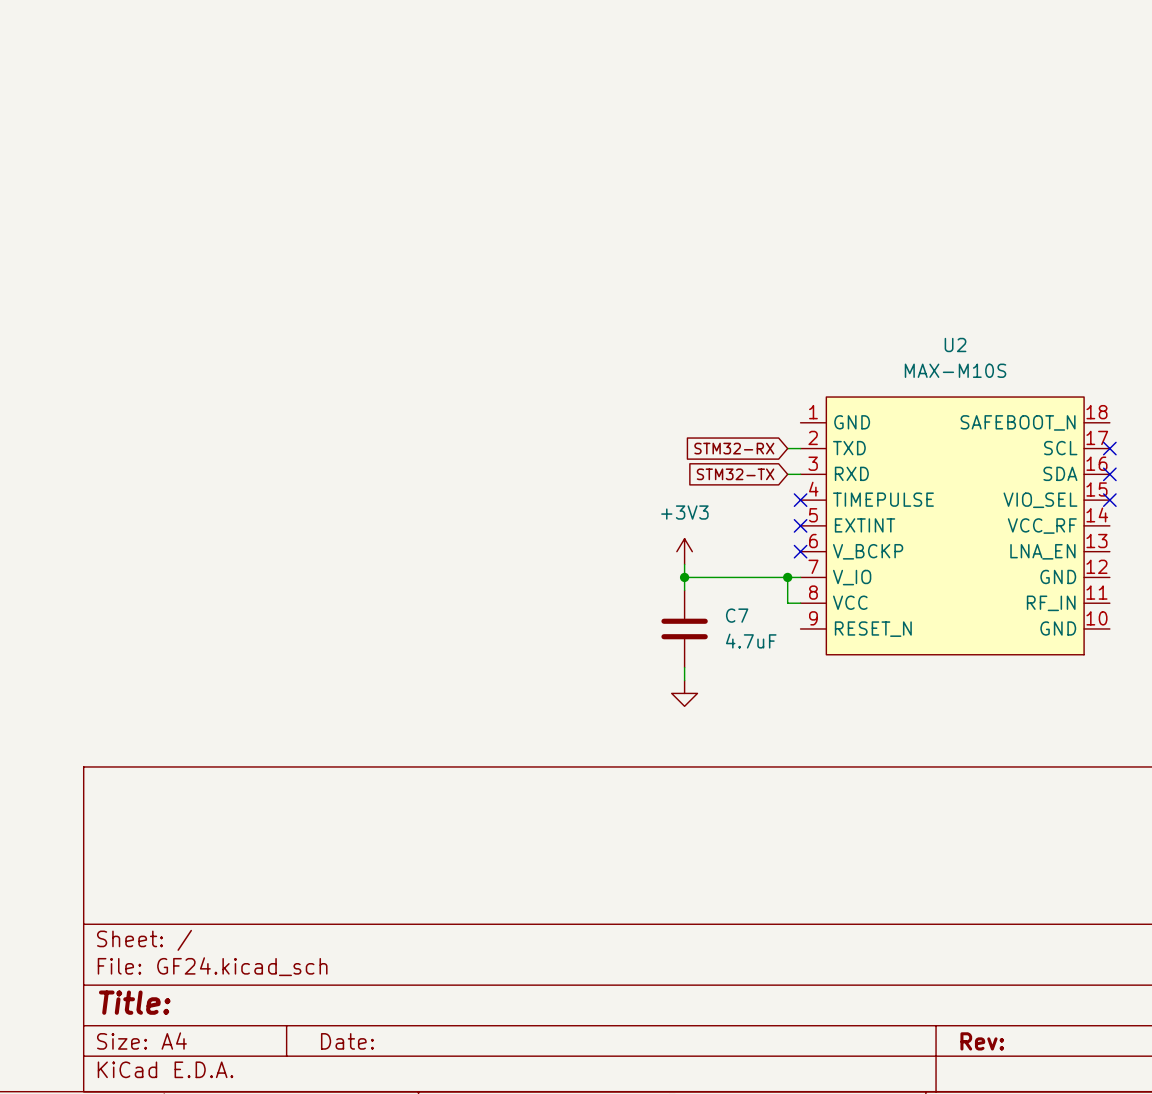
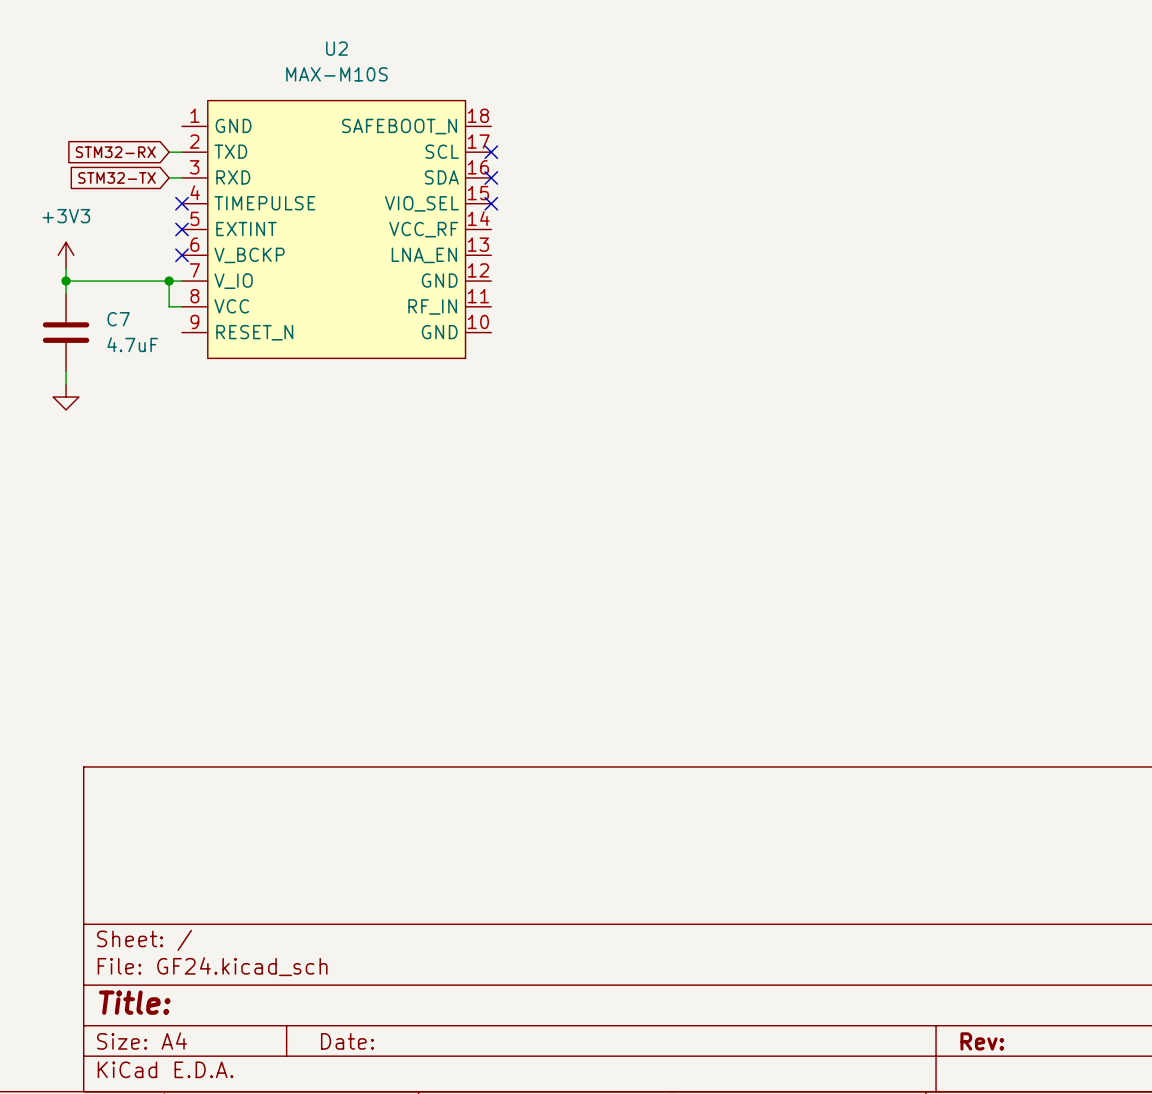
global label: none -> STM32-RX (115, 152)
wire: none -> (169, 152) (182, 152)
no-connect mark: none -> (491, 152)
global label: none -> STM32-TX (116, 177)
wire: none -> (169, 177) (182, 177)
no-connect mark: none -> (491, 177)
no-connect mark: none -> (182, 203)
no-connect mark: none -> (491, 203)
no-connect mark: none -> (182, 229)
power symbol: none -> +3V3 (66, 255)
no-connect mark: none -> (182, 255)
wire: none -> (66, 268) (66, 293)
wire: none -> (66, 281) (182, 281)
junction: none -> (66, 281)
wire: none -> (169, 281) (169, 306) (182, 306)
junction: none -> (169, 281)
wire: none -> (66, 371) (66, 384)
power symbol: none -> (66, 397)
global label: STM32-RX (734, 448) -> none
wire: (787, 448) (800, 448) -> none
no-connect mark: (1109, 448) -> none
global label: STM32-TX (735, 474) -> none
wire: (787, 474) (800, 474) -> none
no-connect mark: (1109, 474) -> none
no-connect mark: (800, 500) -> none
no-connect mark: (1109, 500) -> none
no-connect mark: (800, 525) -> none
U2 position: (955, 525) -> (336, 229)
power symbol: +3V3 (684, 551) -> none
no-connect mark: (800, 551) -> none
wire: (684, 564) (684, 590) -> none
wire: (684, 577) (800, 577) -> none
junction: (684, 577) -> none
wire: (787, 577) (787, 603) (800, 603) -> none
junction: (787, 577) -> none
C7 position: (684, 628) -> (66, 332)
wire: (684, 667) (684, 680) -> none
power symbol: (684, 693) -> none

